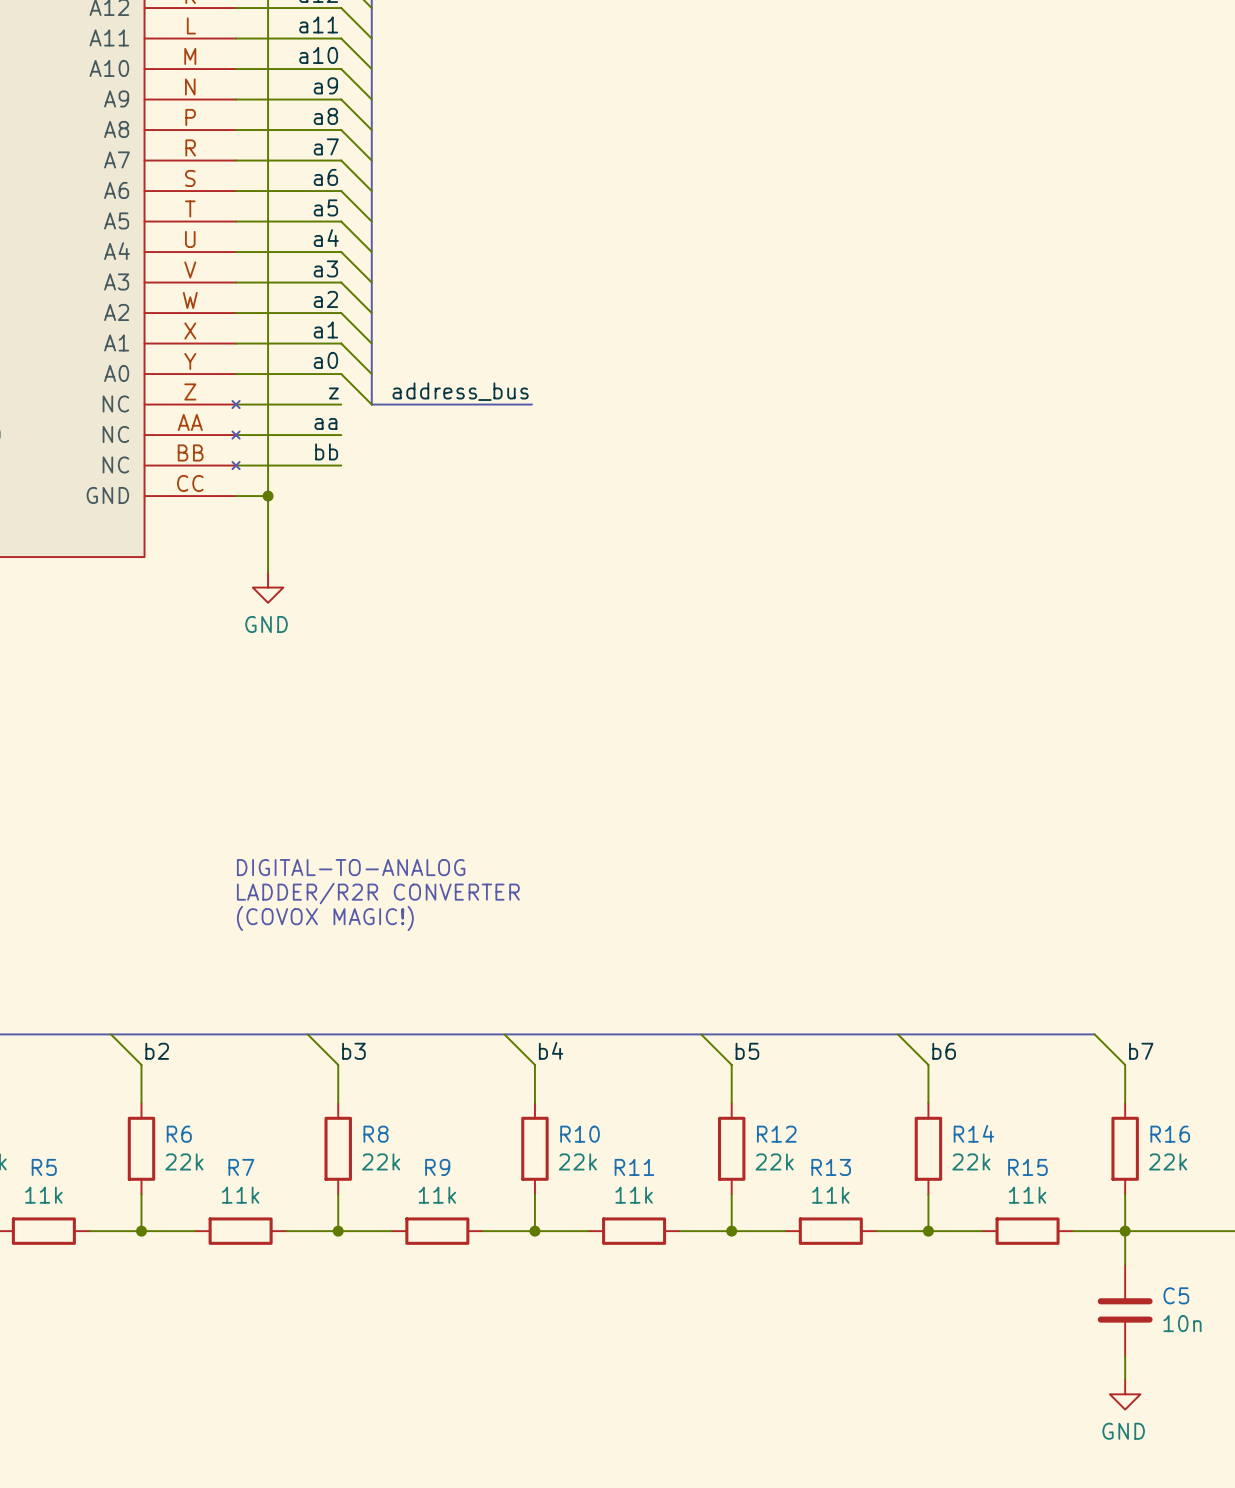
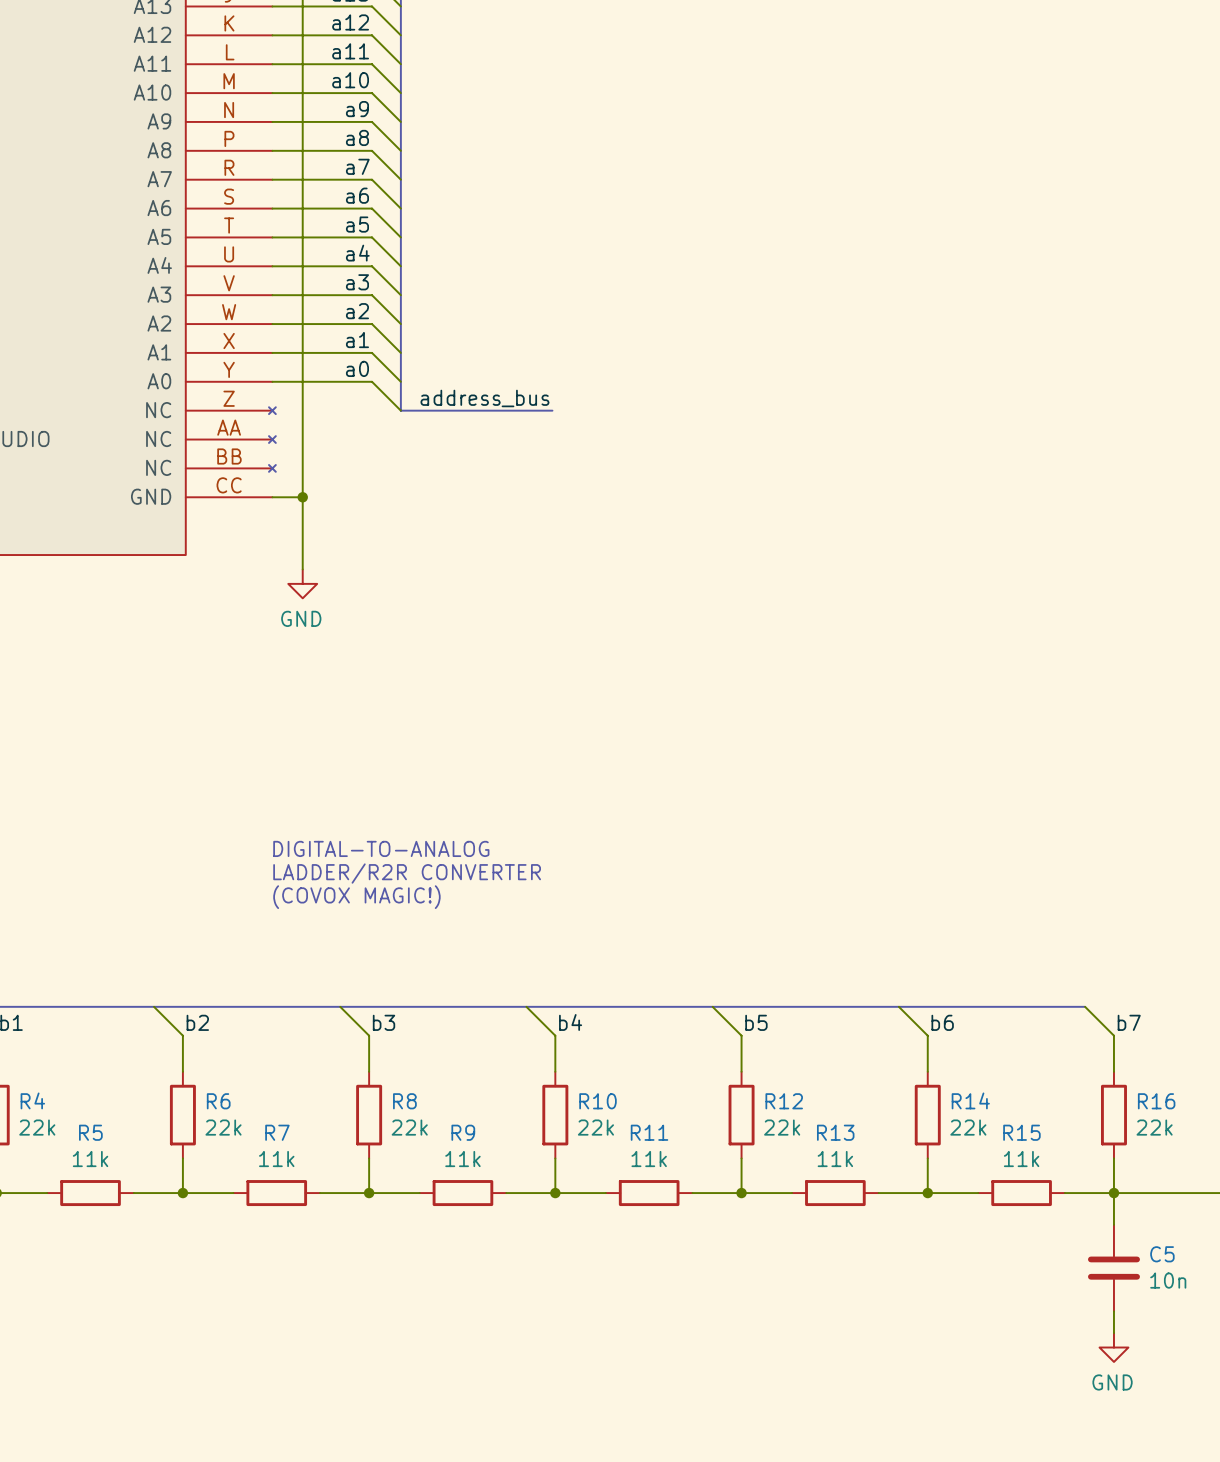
label: z (333, 393) -> none
wire: (236, 404) (341, 404) -> none
label: aa (325, 423) -> none
wire: (236, 435) (341, 435) -> none
label: bb (326, 451) -> none
wire: (236, 465) (341, 465) -> none

